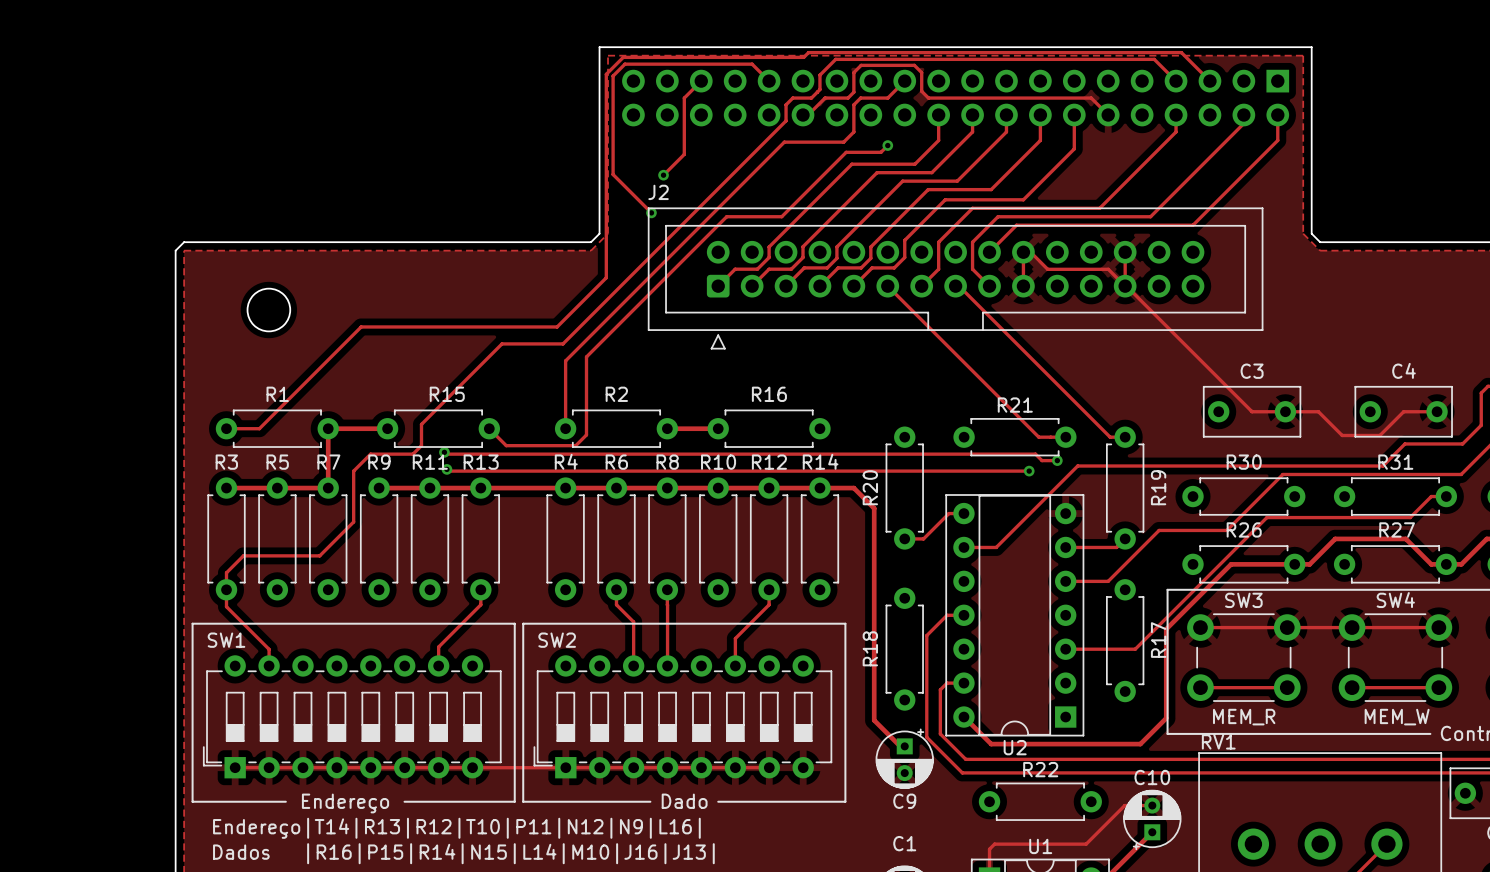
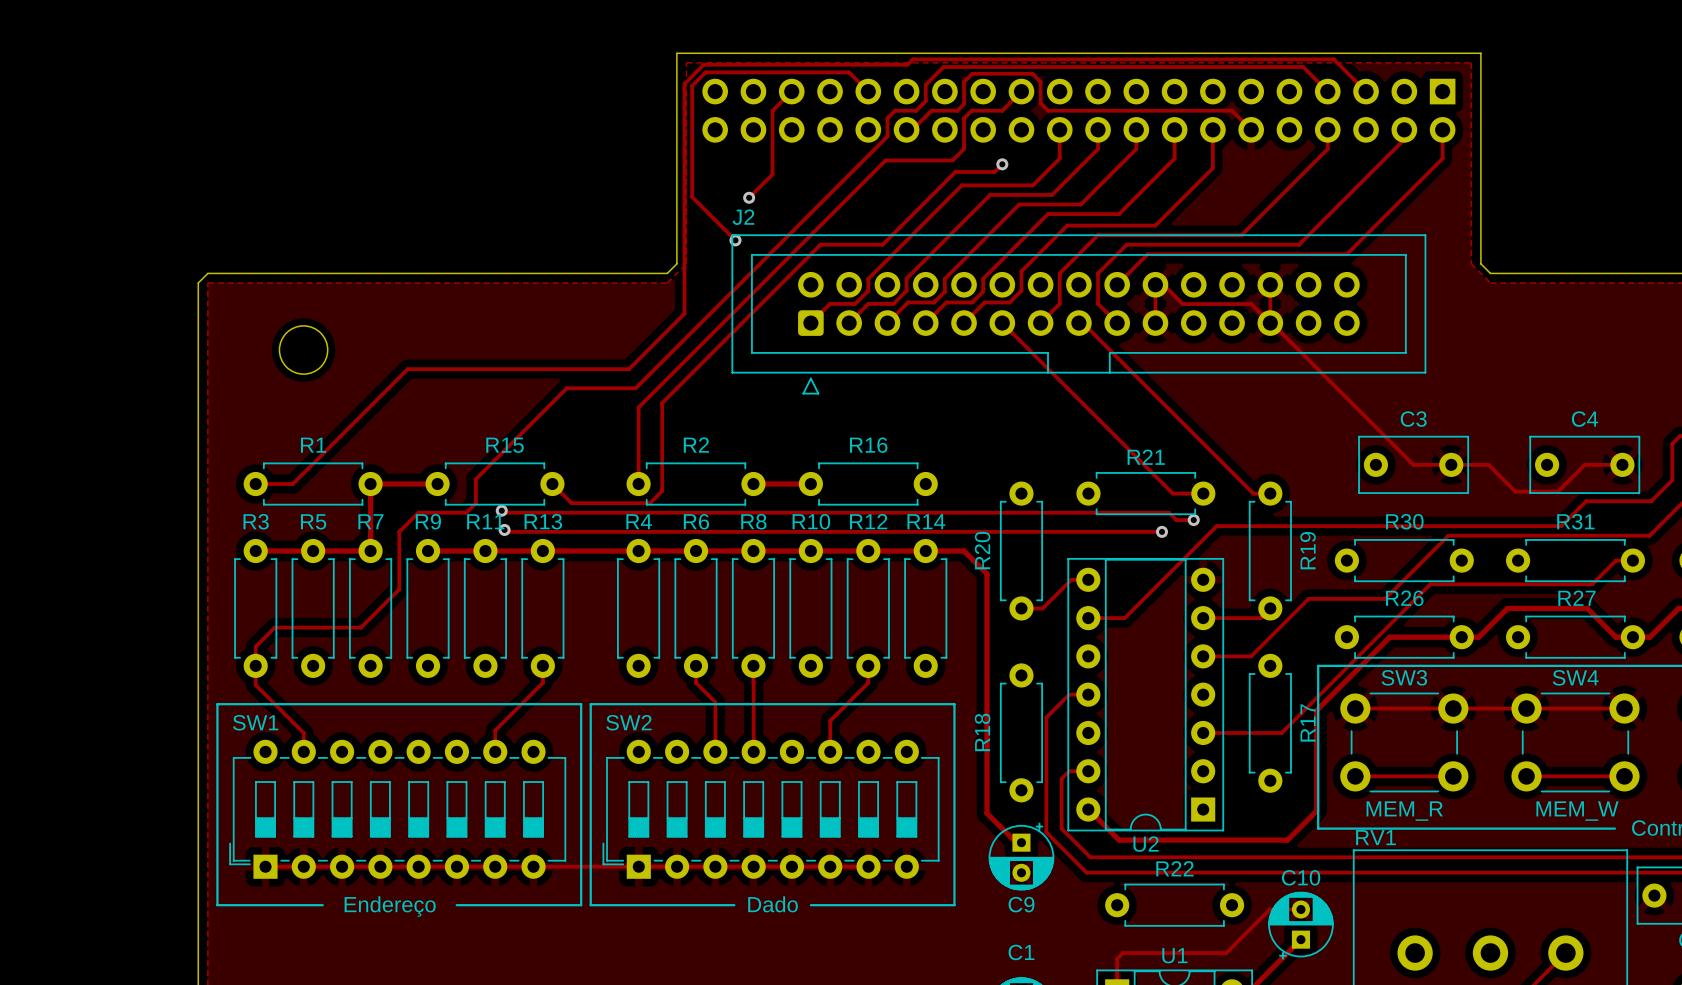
text: Endereço|T14|R13|R12|T10|P11|N12|N9|L16| (456, 828) -> none
text: Dados |R16|P15|R14|N15|L14|M10|J16|J13| (463, 853) -> none

